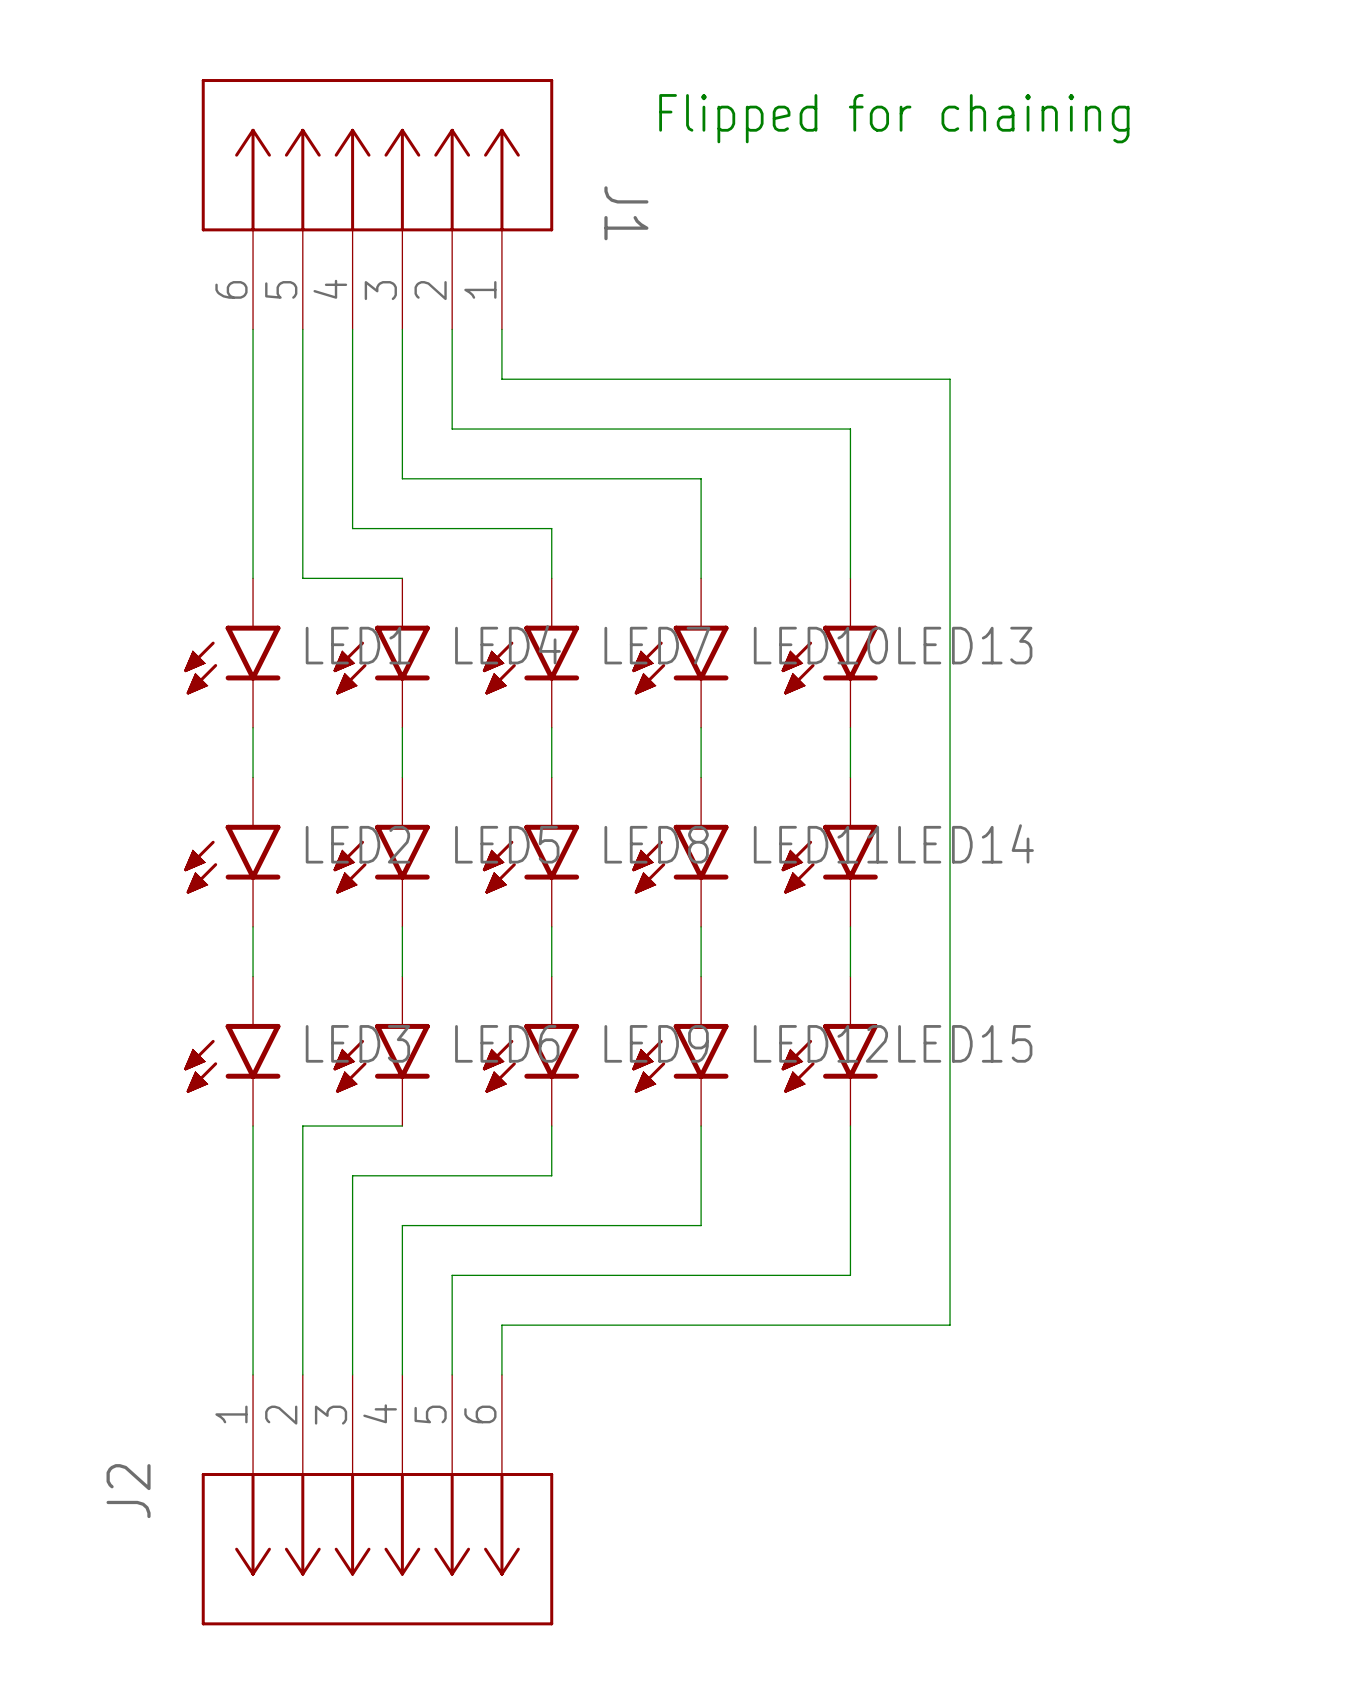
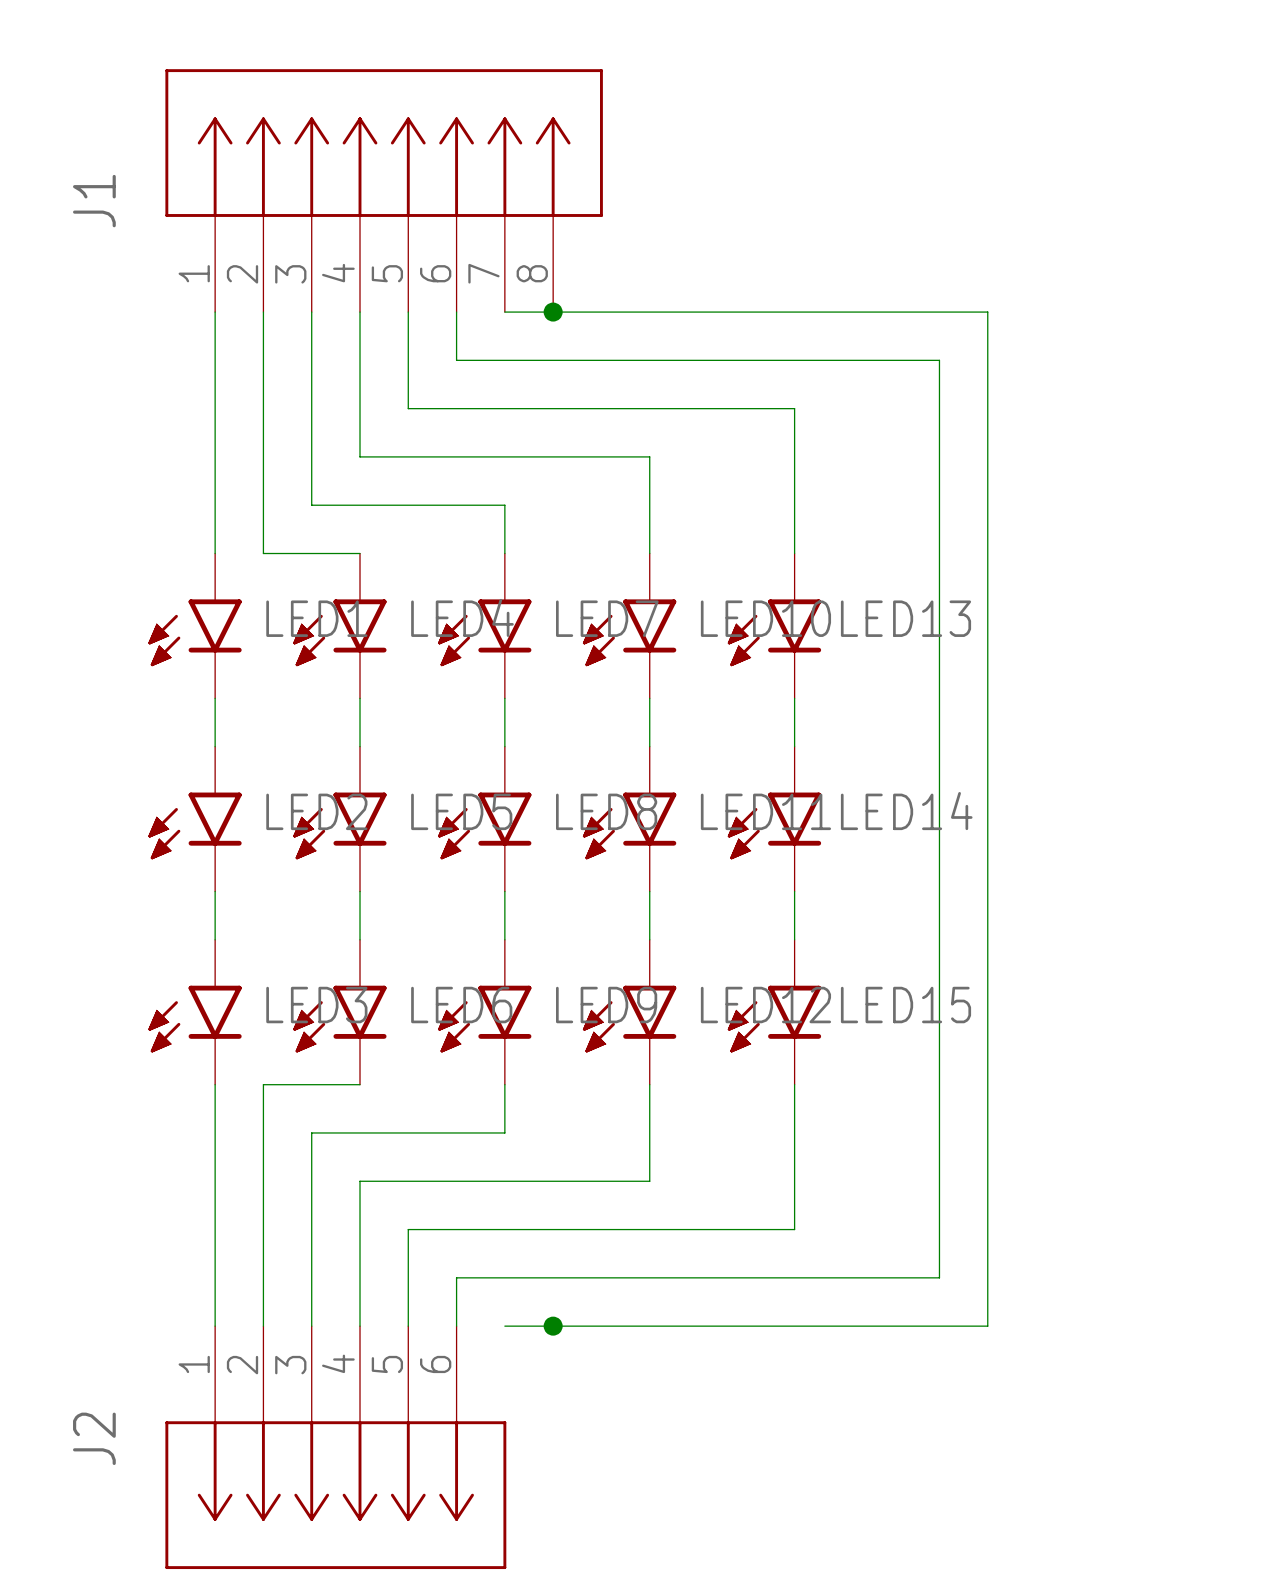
J1 symbol: [201, 79, 554, 330] -> [165, 69, 603, 313]
text: Flipped for chaining (894, 118) -> none
J1 name position: J1 (626, 213) -> J1 (94, 201)
wire: none -> (504, 312) (987, 312) (987, 1326) (504, 1326)
junction: none -> (553, 312)
wire: (950, 379) (950, 1325) -> (891, 360) (939, 360) (939, 1277) (891, 1277)
junction: none -> (553, 1326)

